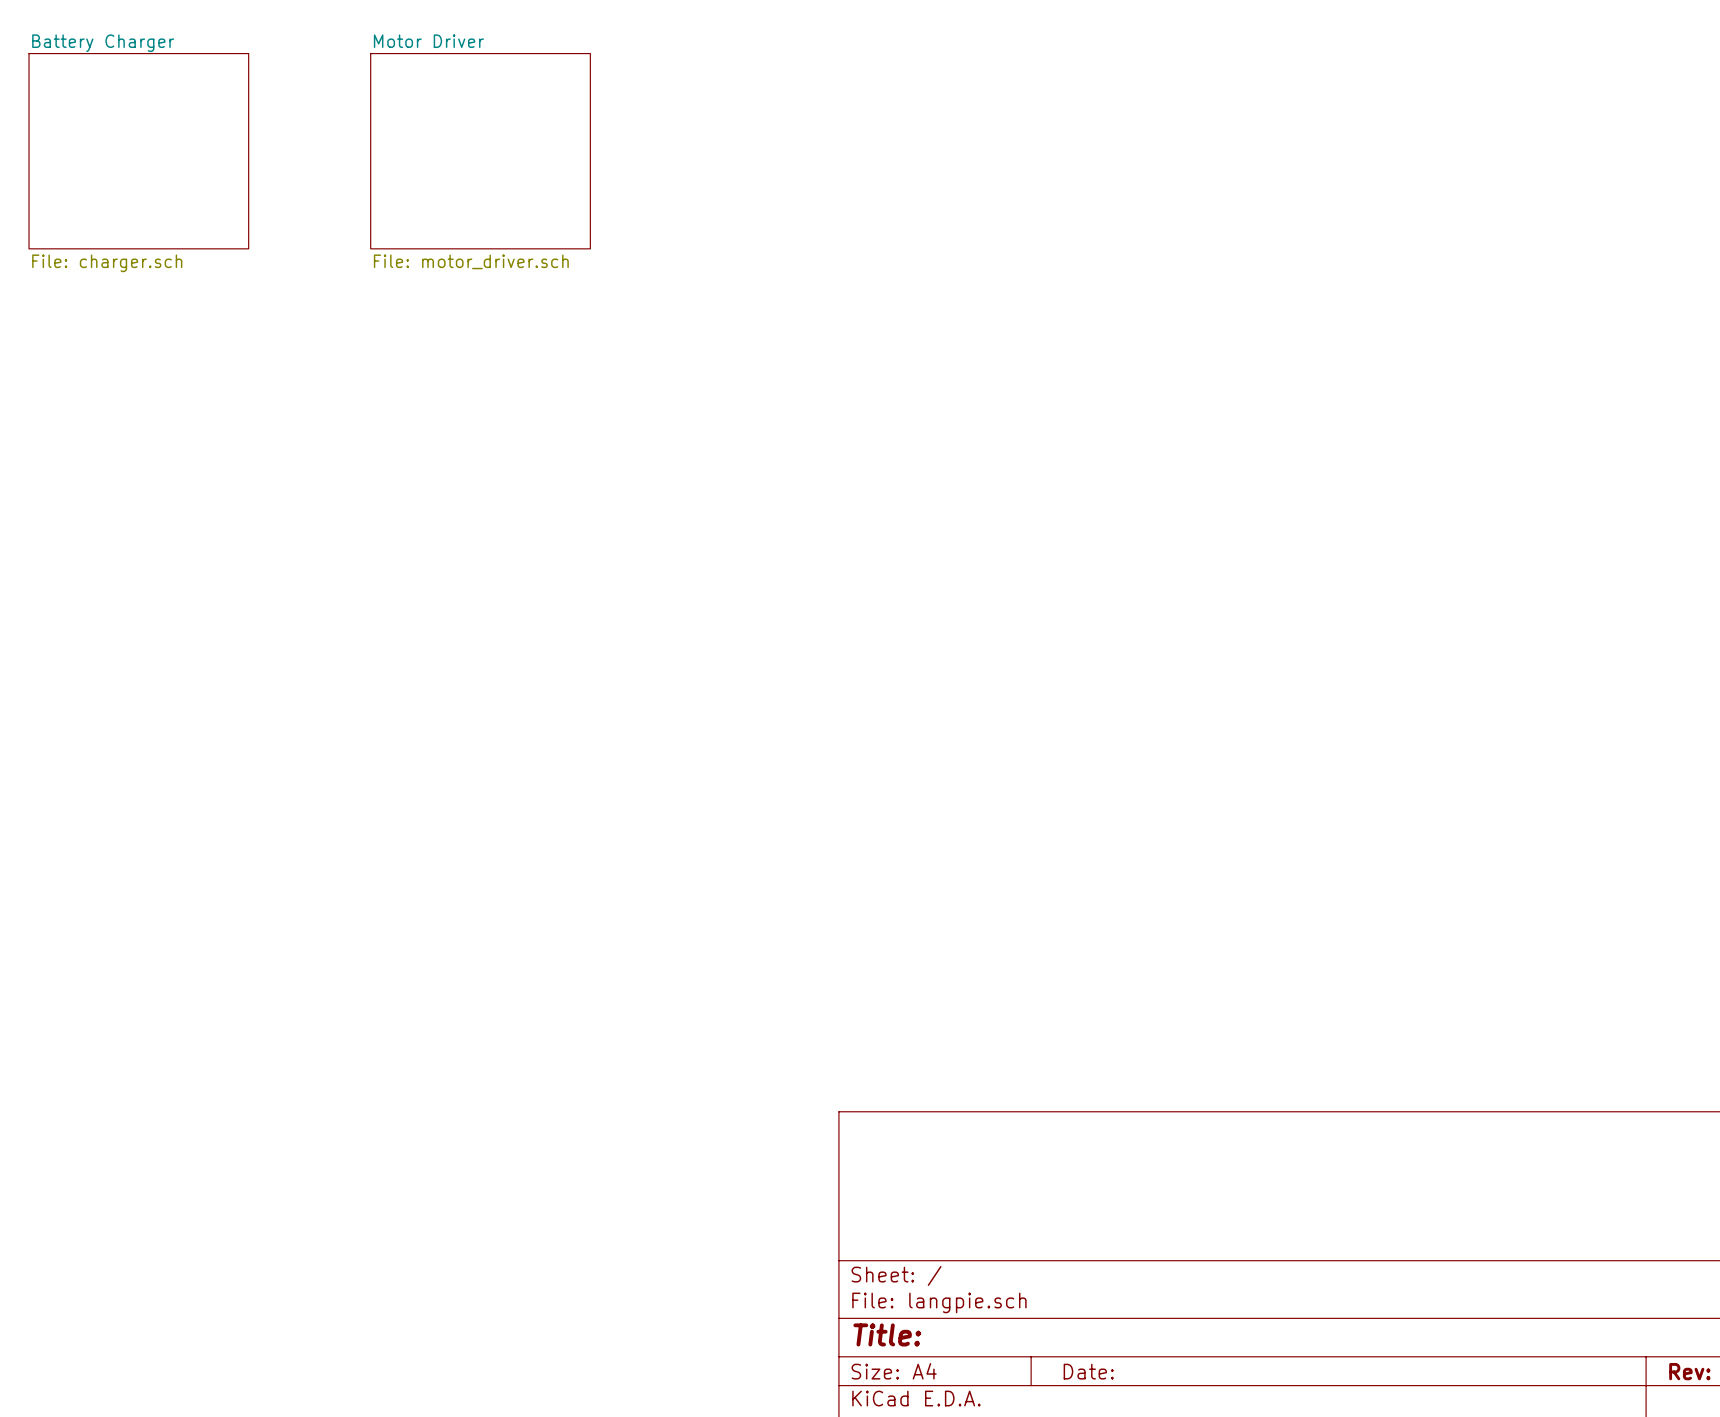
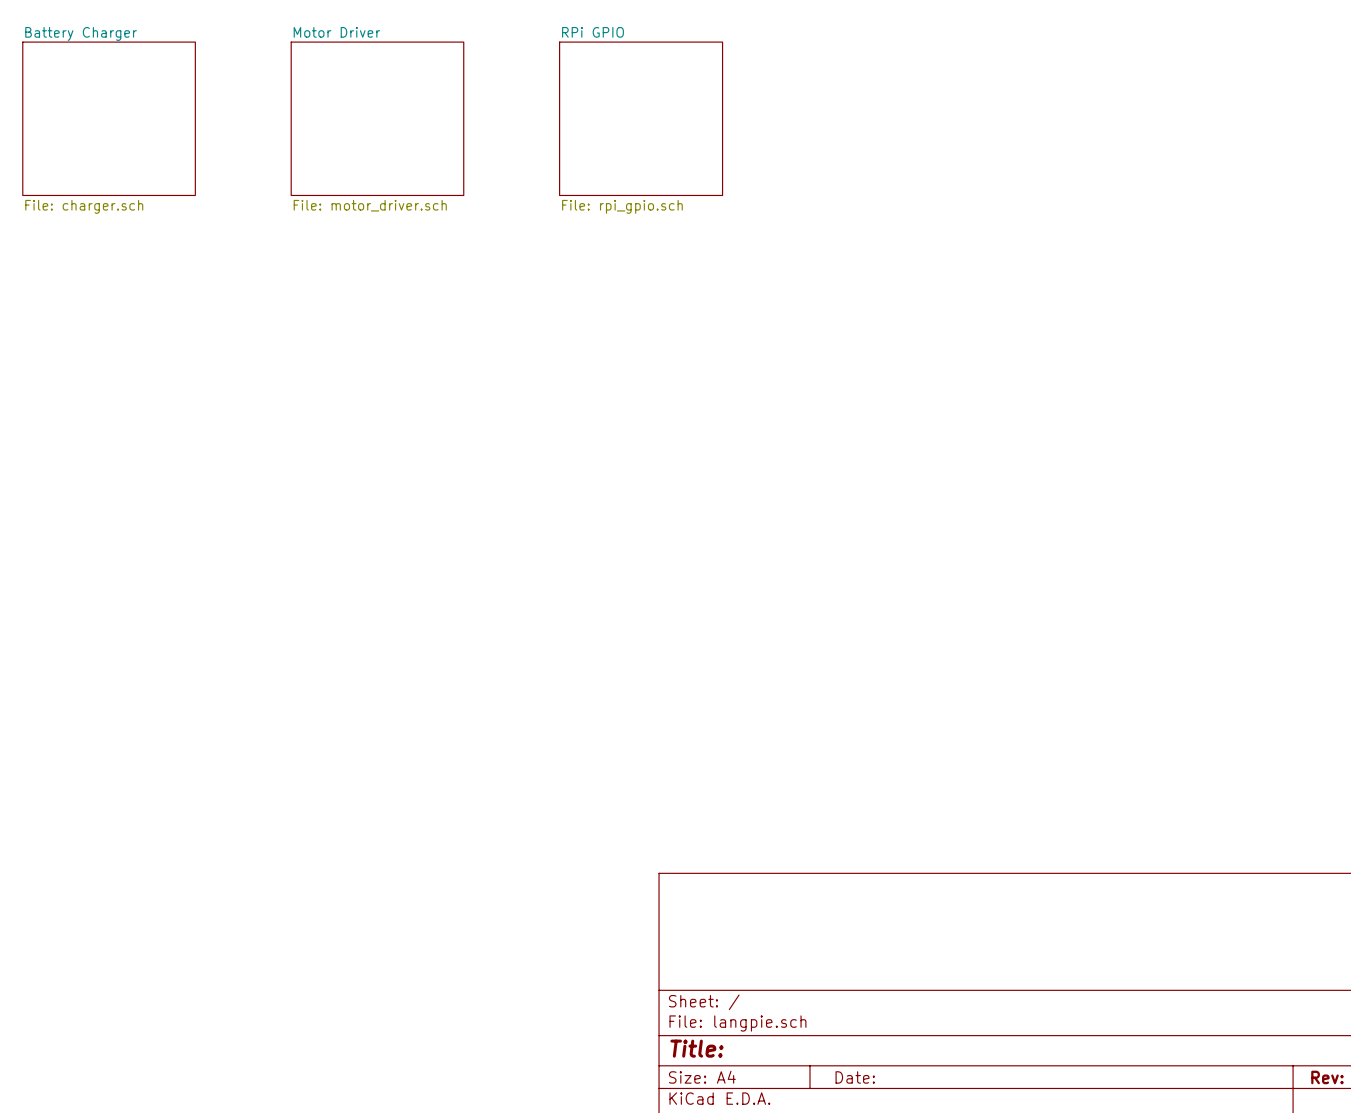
sheet RPi GPIO: none -> File: rpi_gpio.sch (641, 118)

